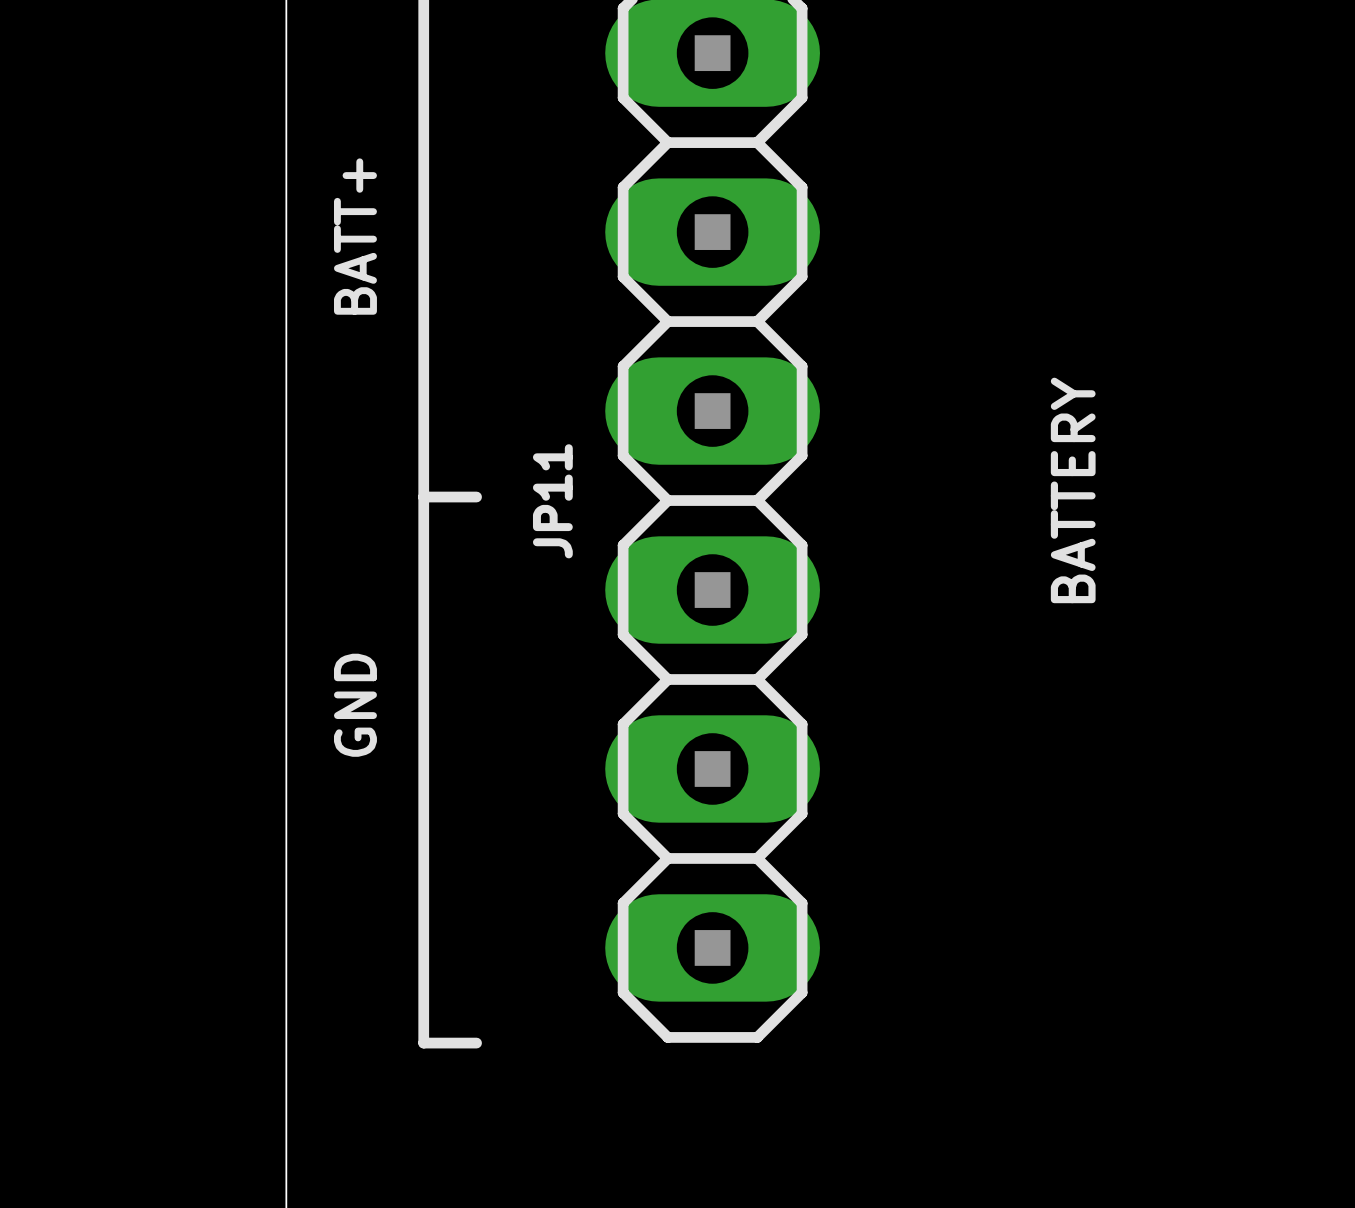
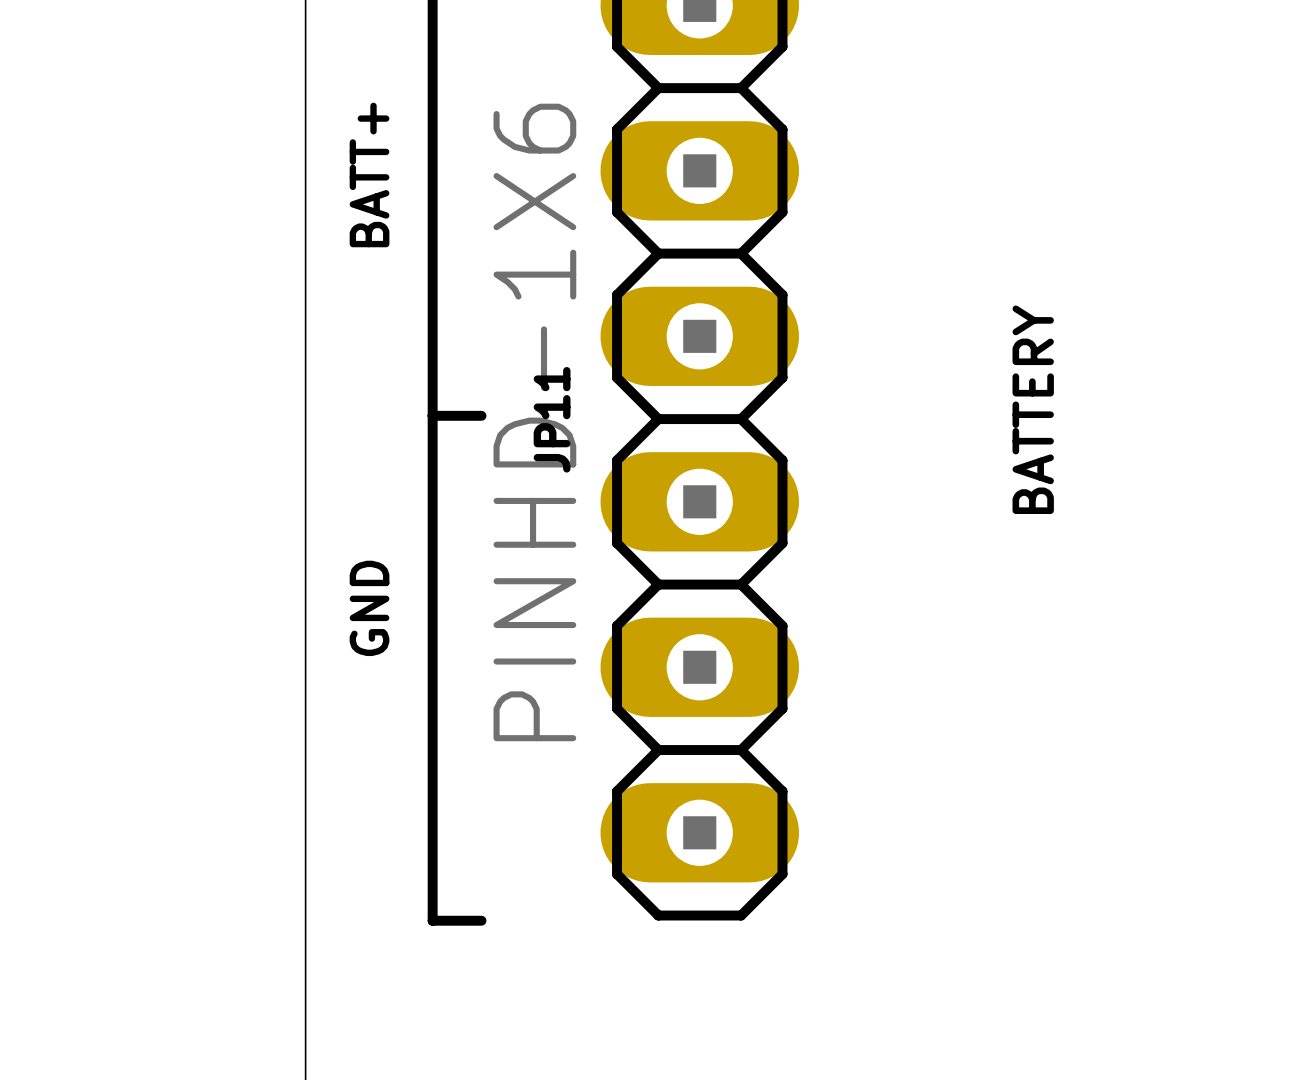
JP11 value: none -> PINHD-1X6 (534, 422)

